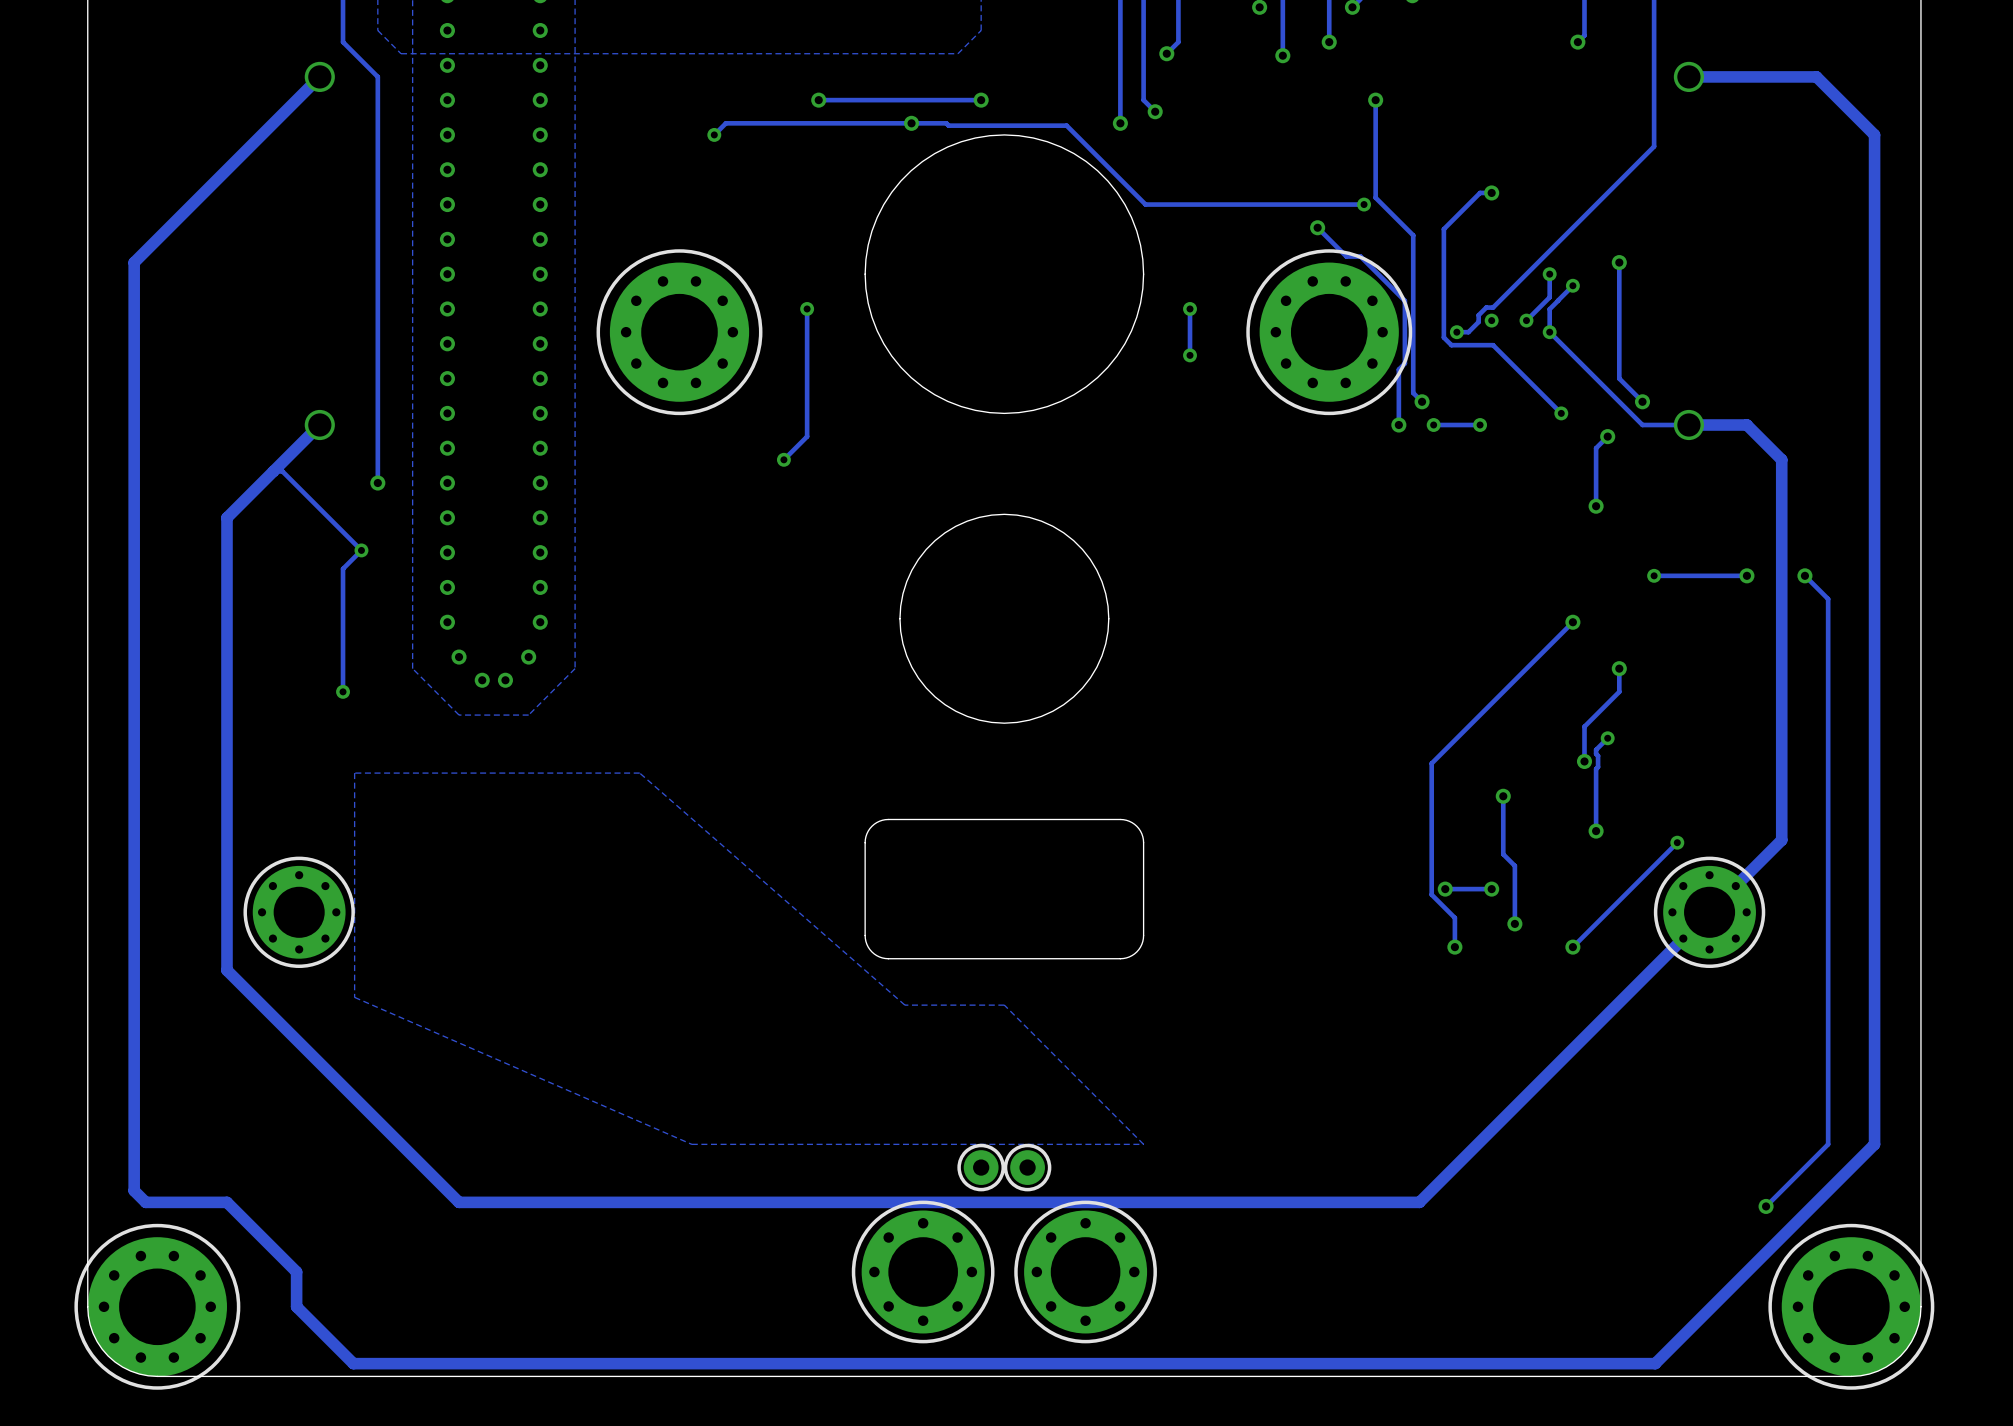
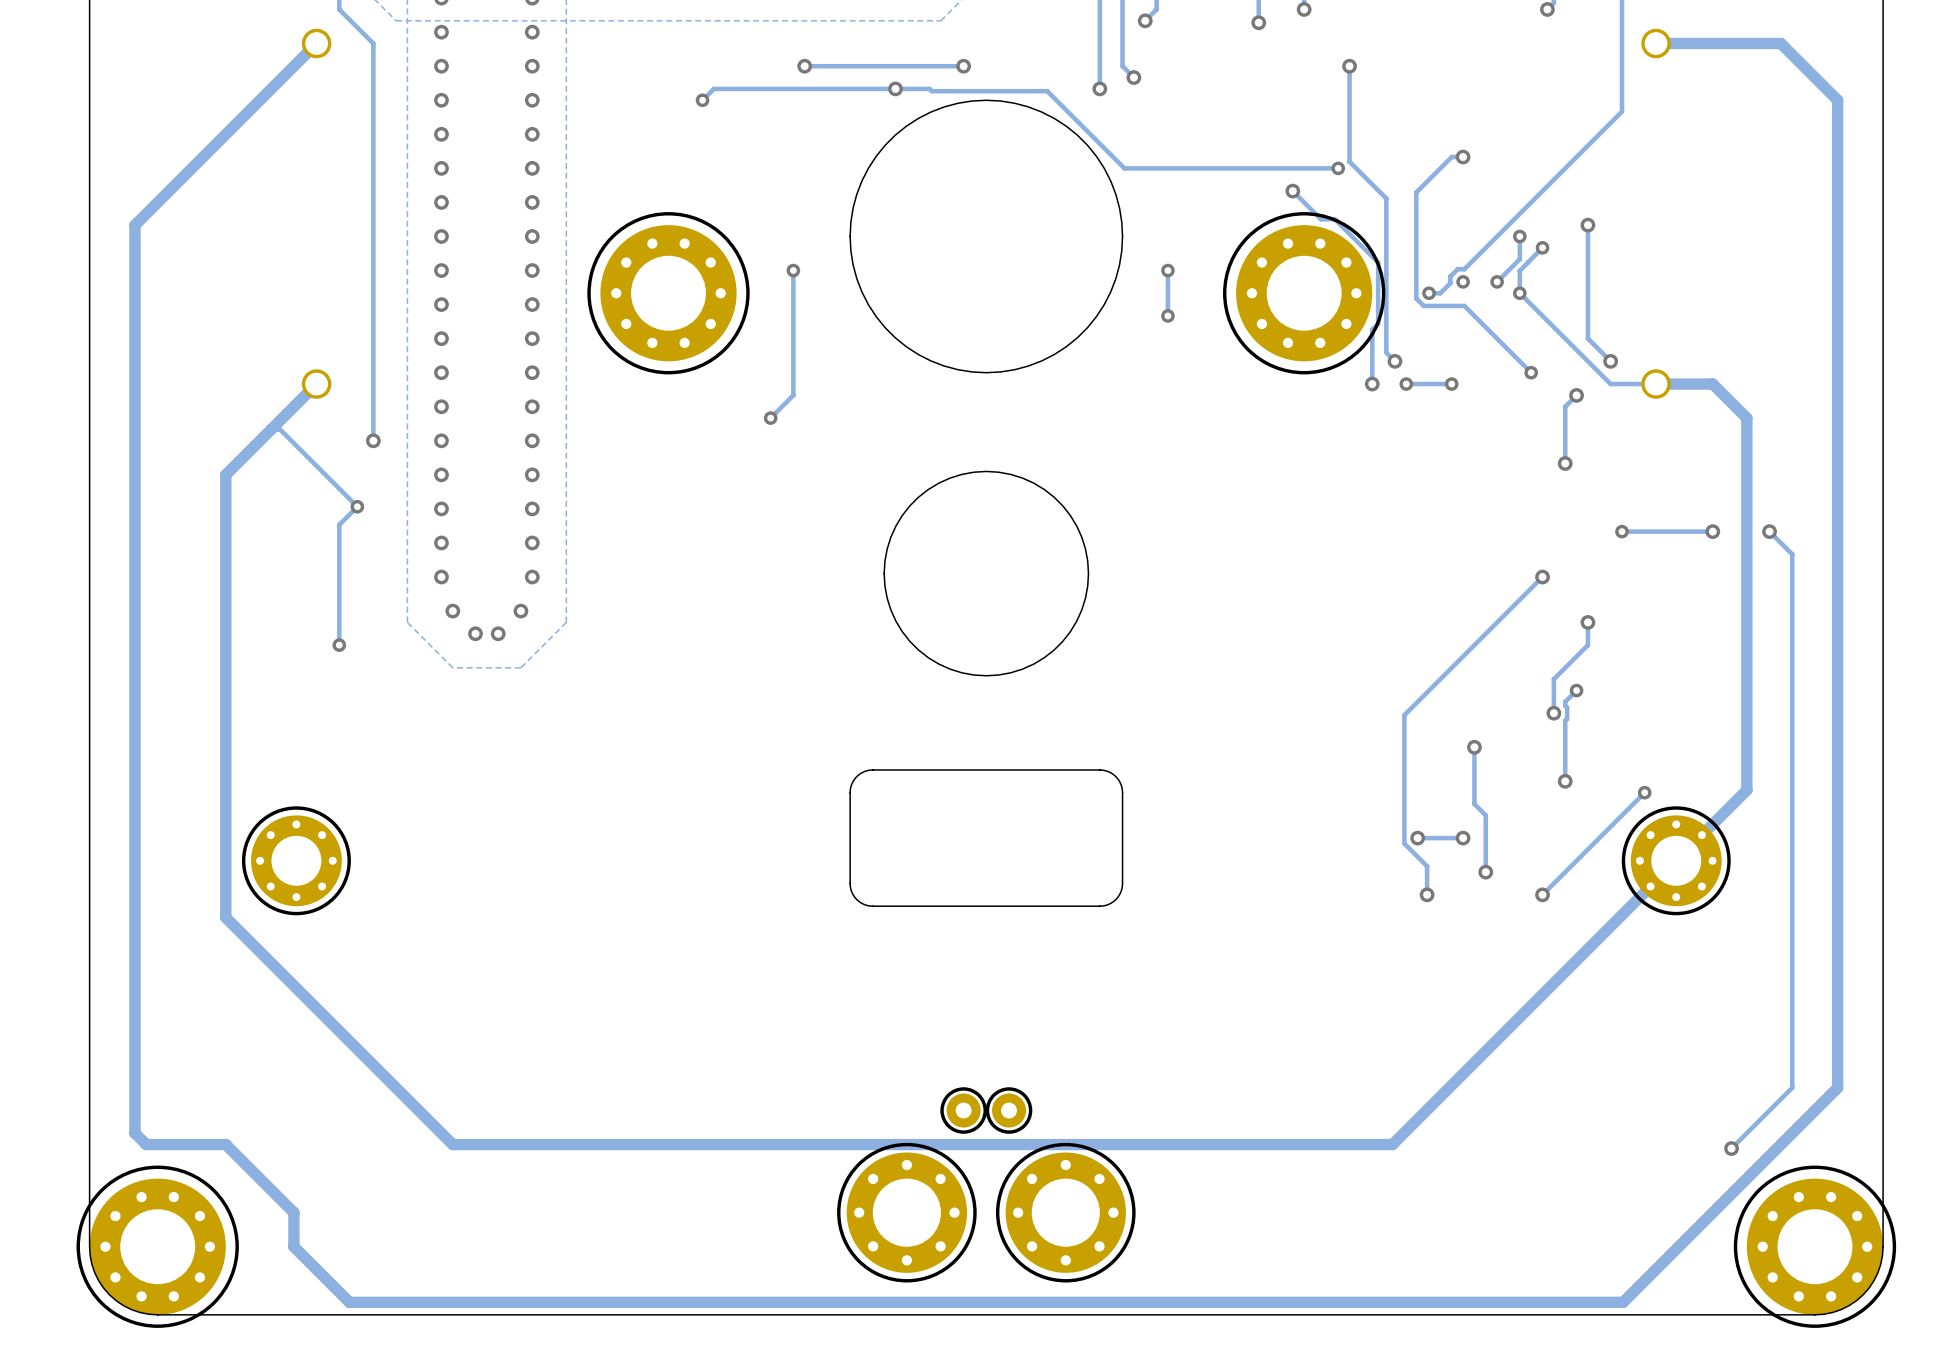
zone outline: (639, 773) (904, 1005) (1004, 1005) (1143, 1144) (691, 1144) (354, 997) (354, 773) (639, 773) -> none

